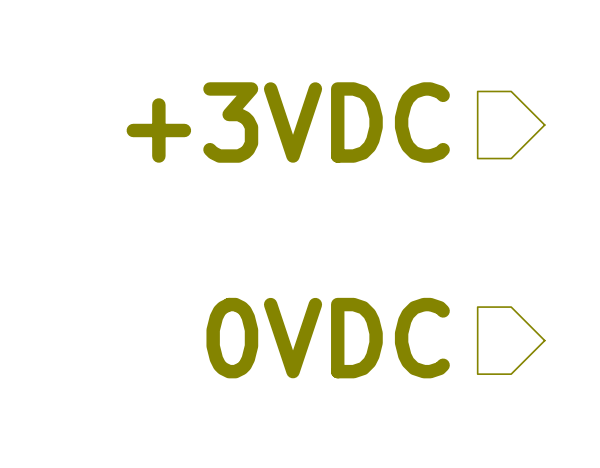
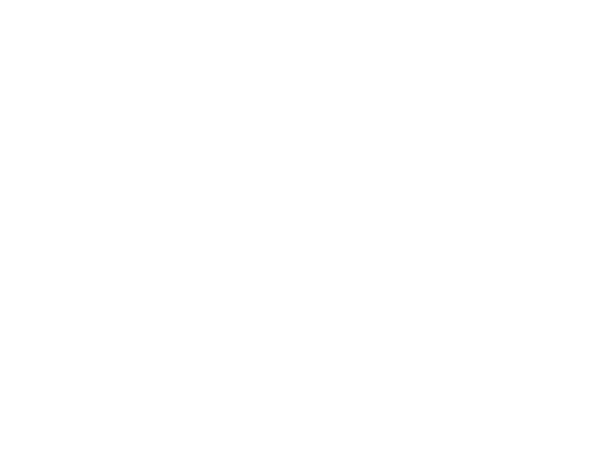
hierarchical label: +3VDC (288, 122) -> none
hierarchical label: 0VDC (328, 338) -> none

